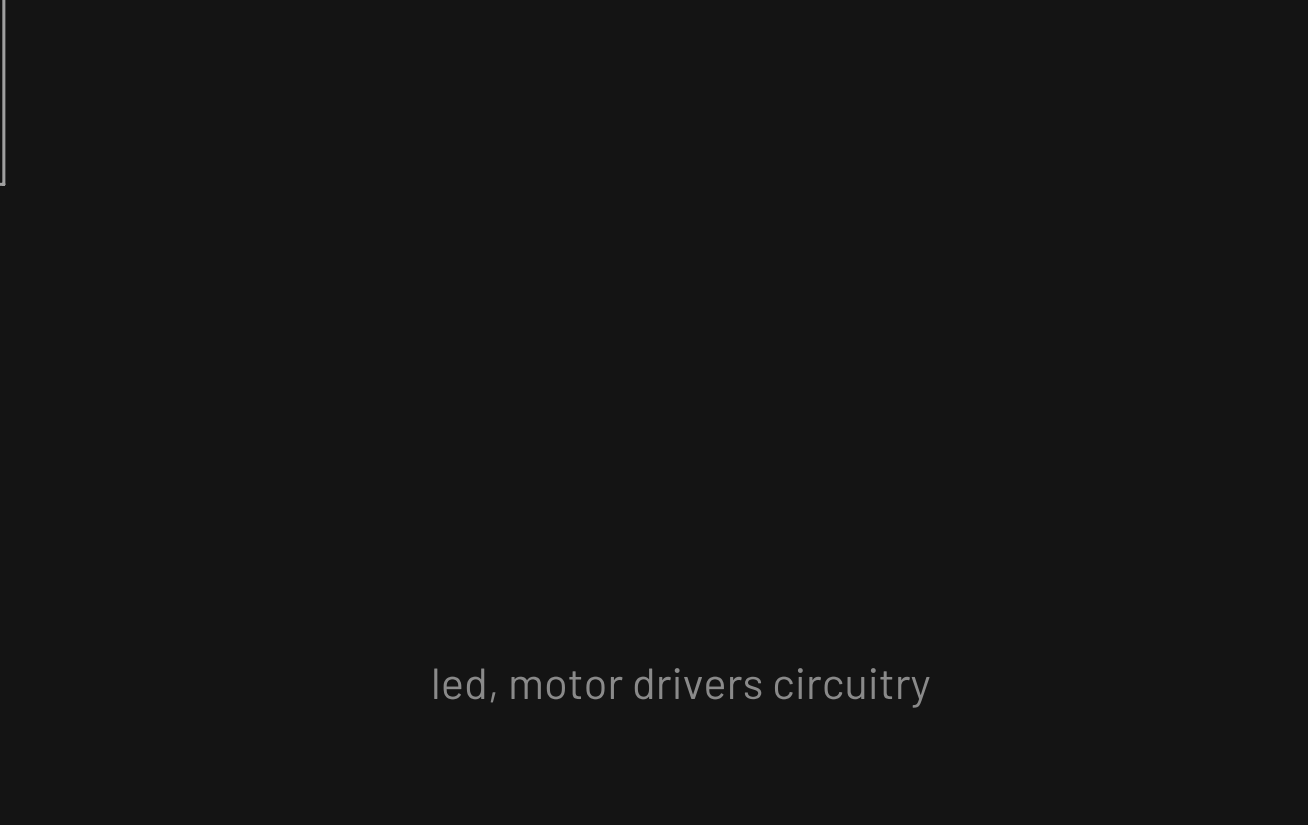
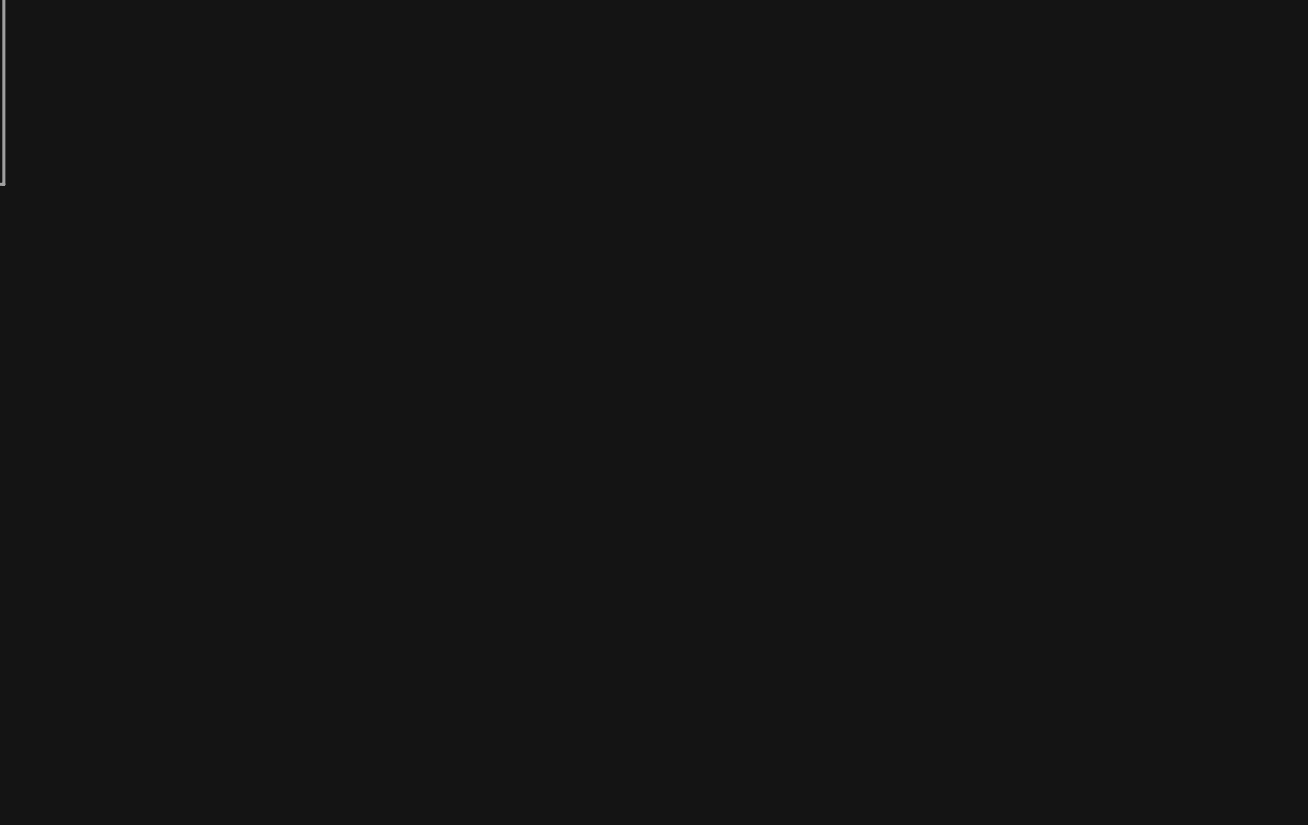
text: led, motor drivers circuitry (681, 687) -> none

